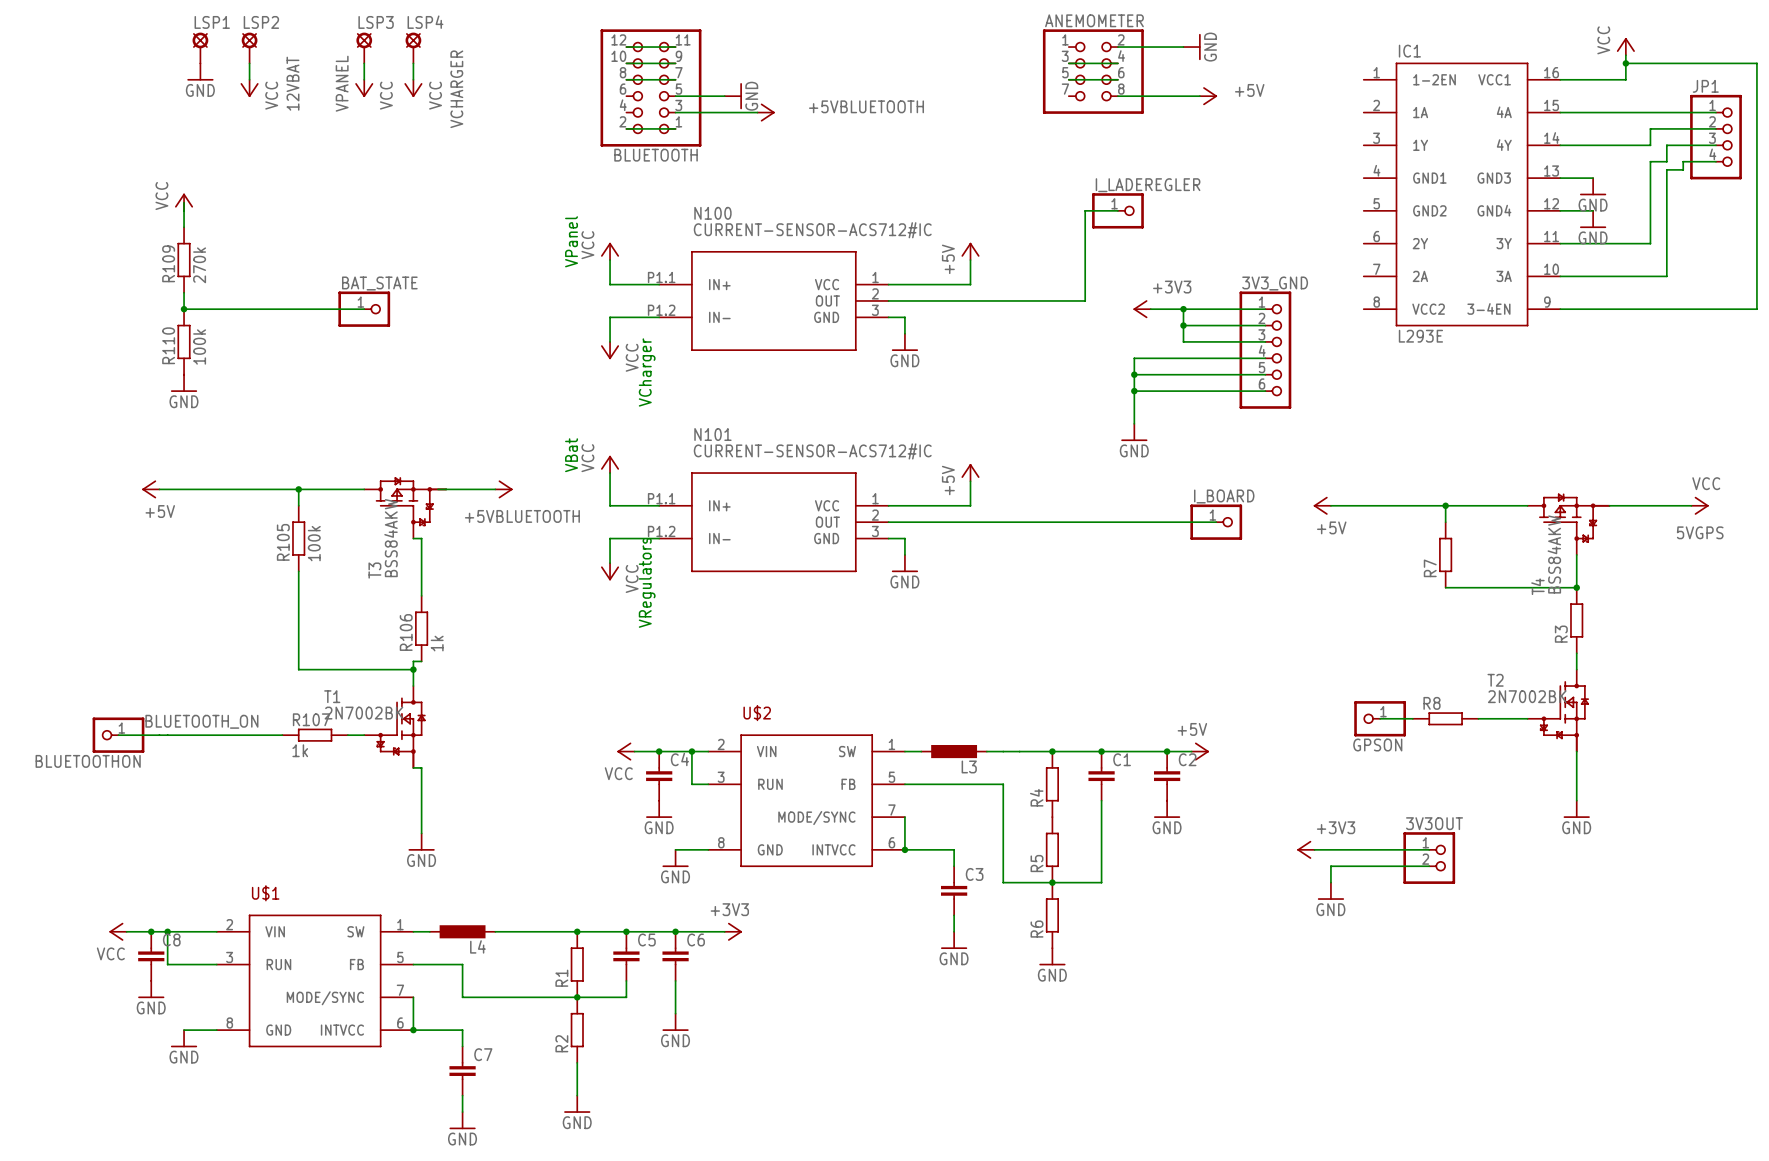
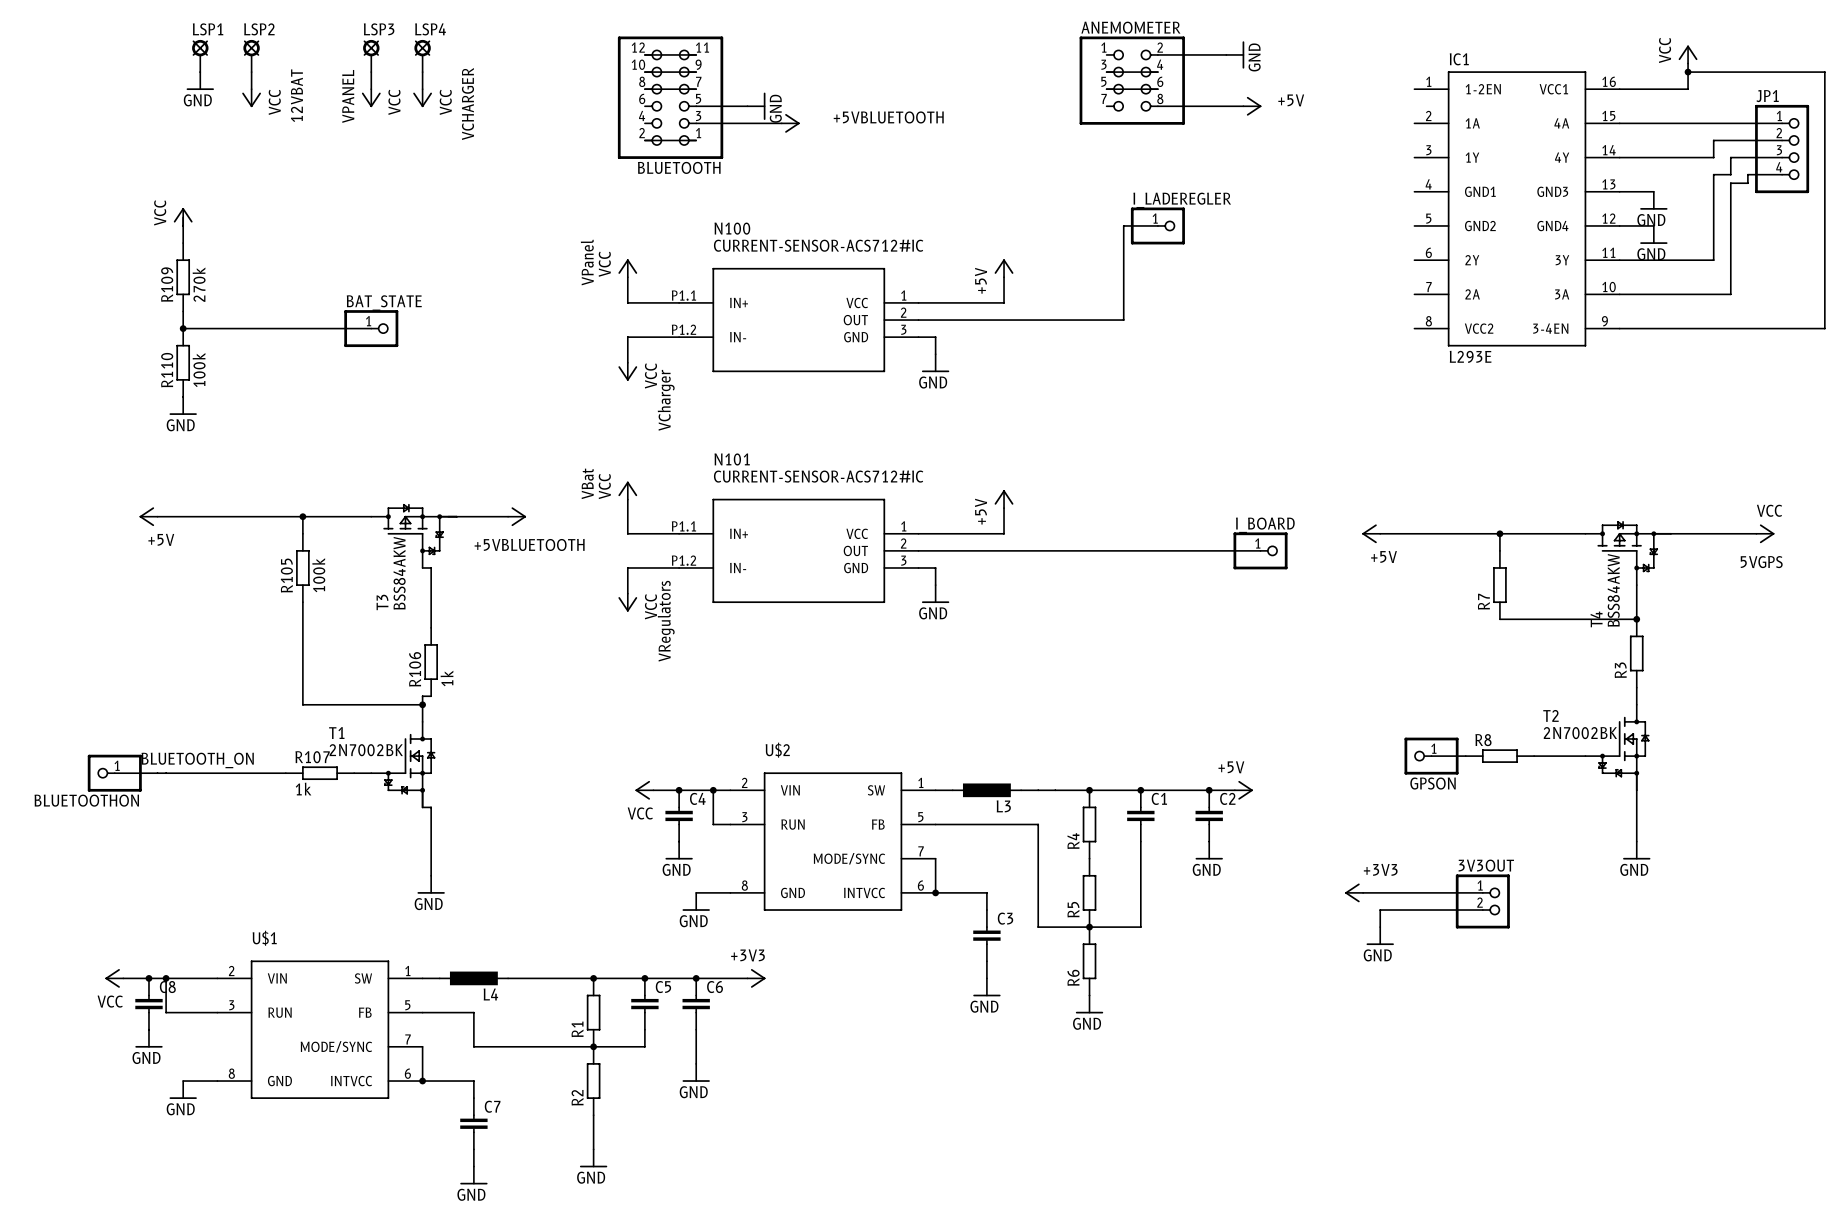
label: +3V3 (1172, 287) -> none
power symbol: (1142, 309) -> none
wire: (1150, 309) (1265, 309) -> none
wire: (1183, 309) (1183, 341) (1265, 341) -> none
junction: (1183, 309) -> none
wire: (1183, 325) (1265, 325) -> none
junction: (1183, 325) -> none
3V3_GND: (1265, 350) -> none
wire: (1265, 358) (1134, 358) (1134, 423) -> none
wire: (1134, 374) (1265, 374) -> none
junction: (1134, 374) -> none
wire: (1134, 391) (1265, 391) -> none
junction: (1134, 391) -> none
power symbol: GND (1134, 432) -> none

